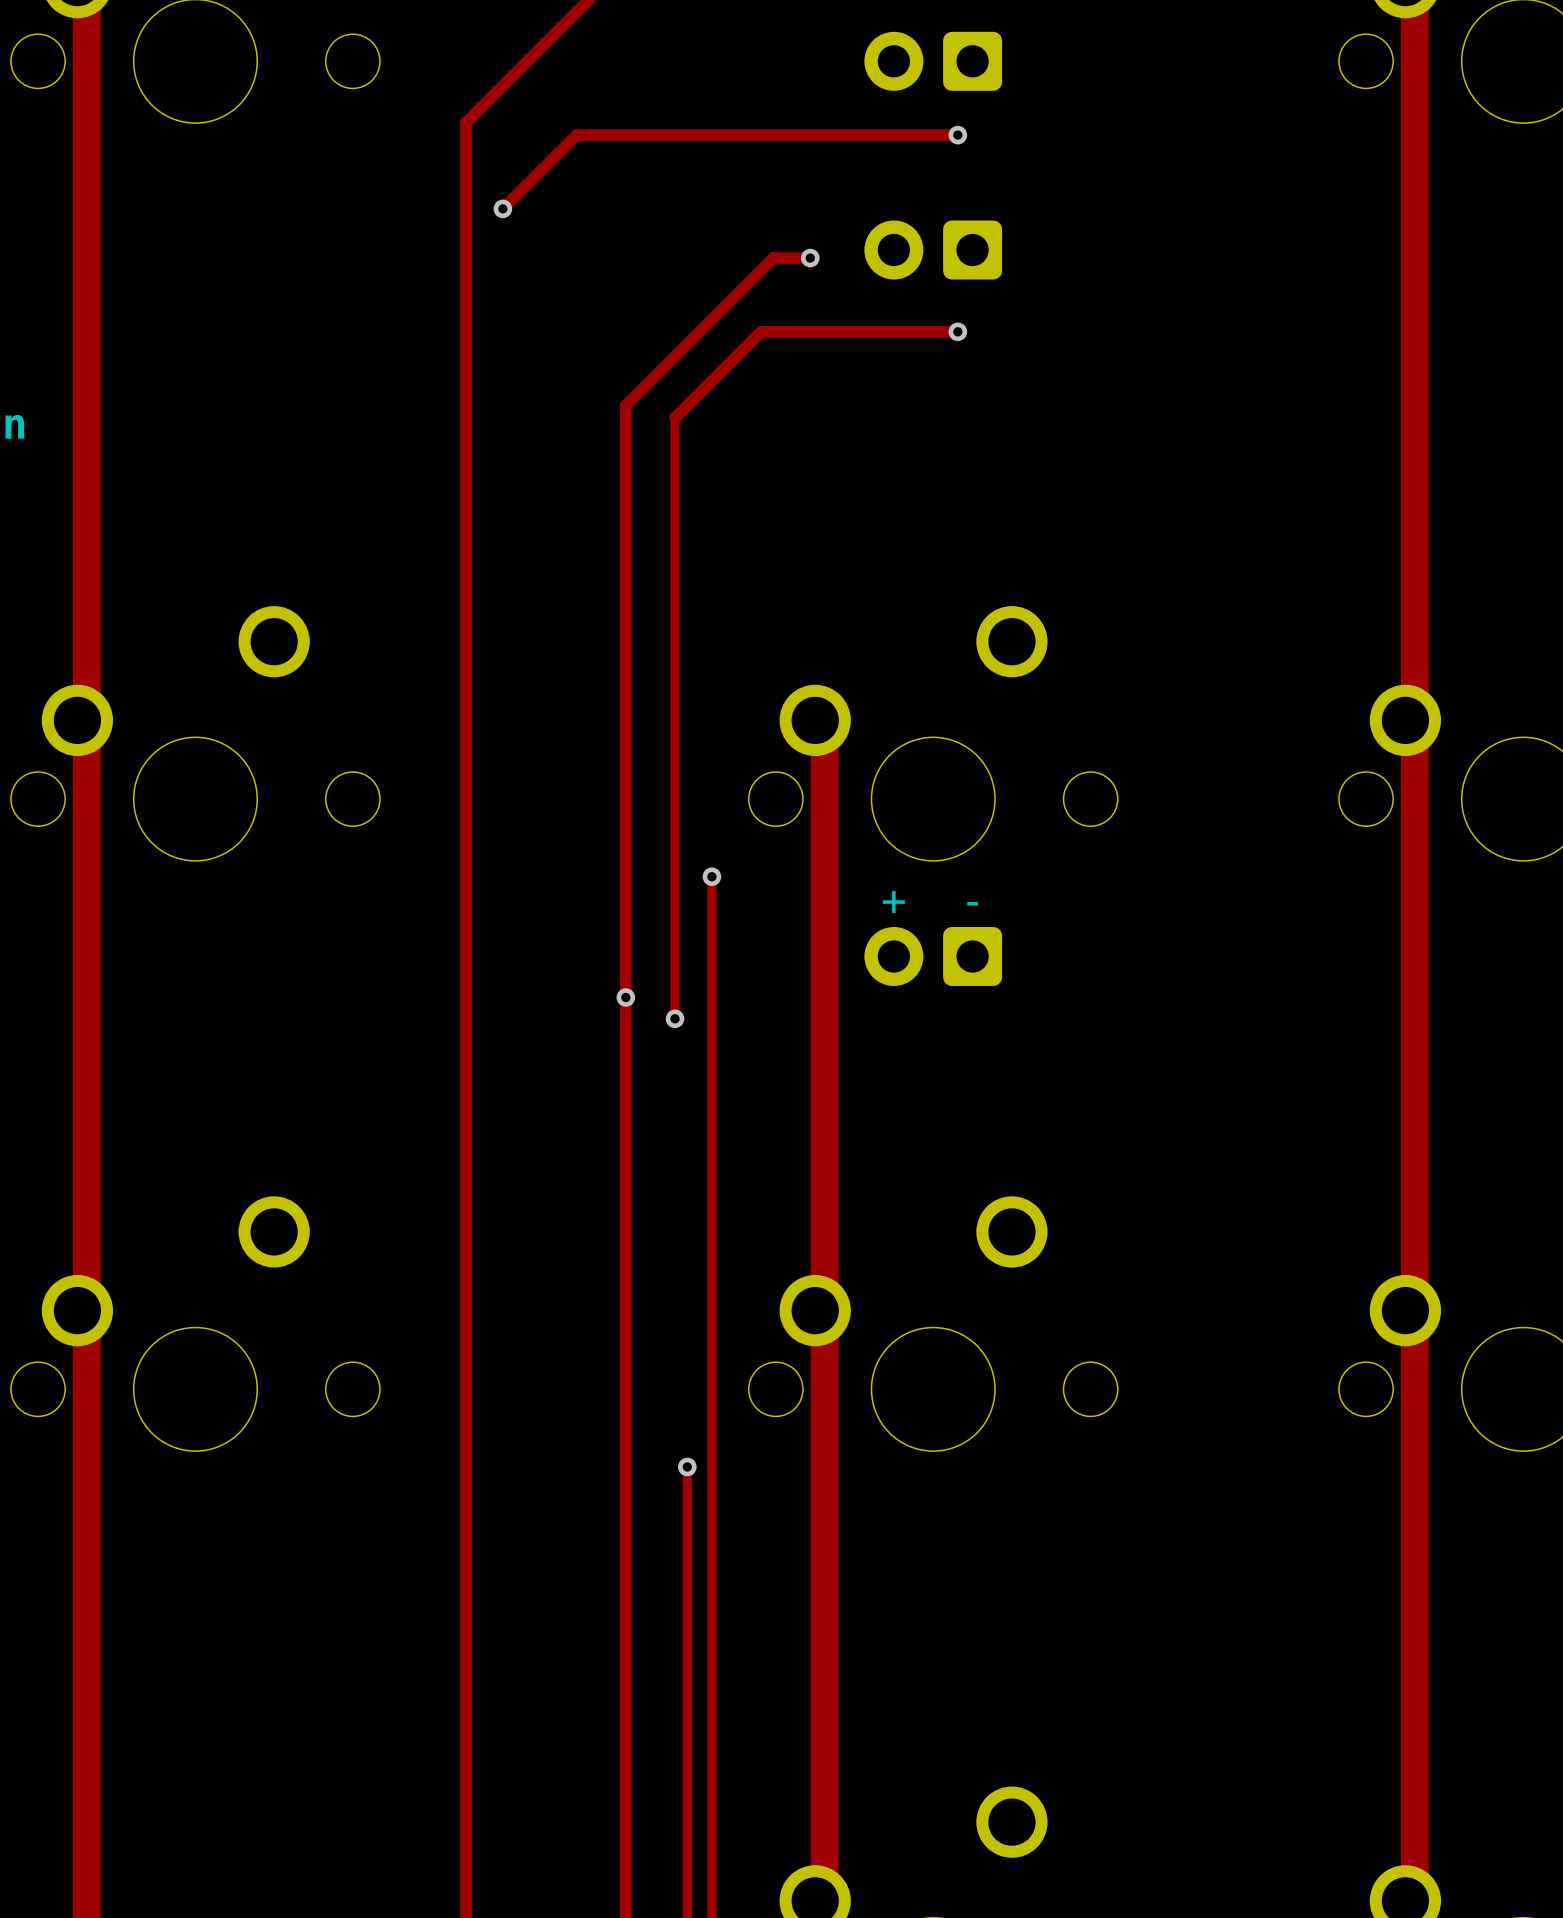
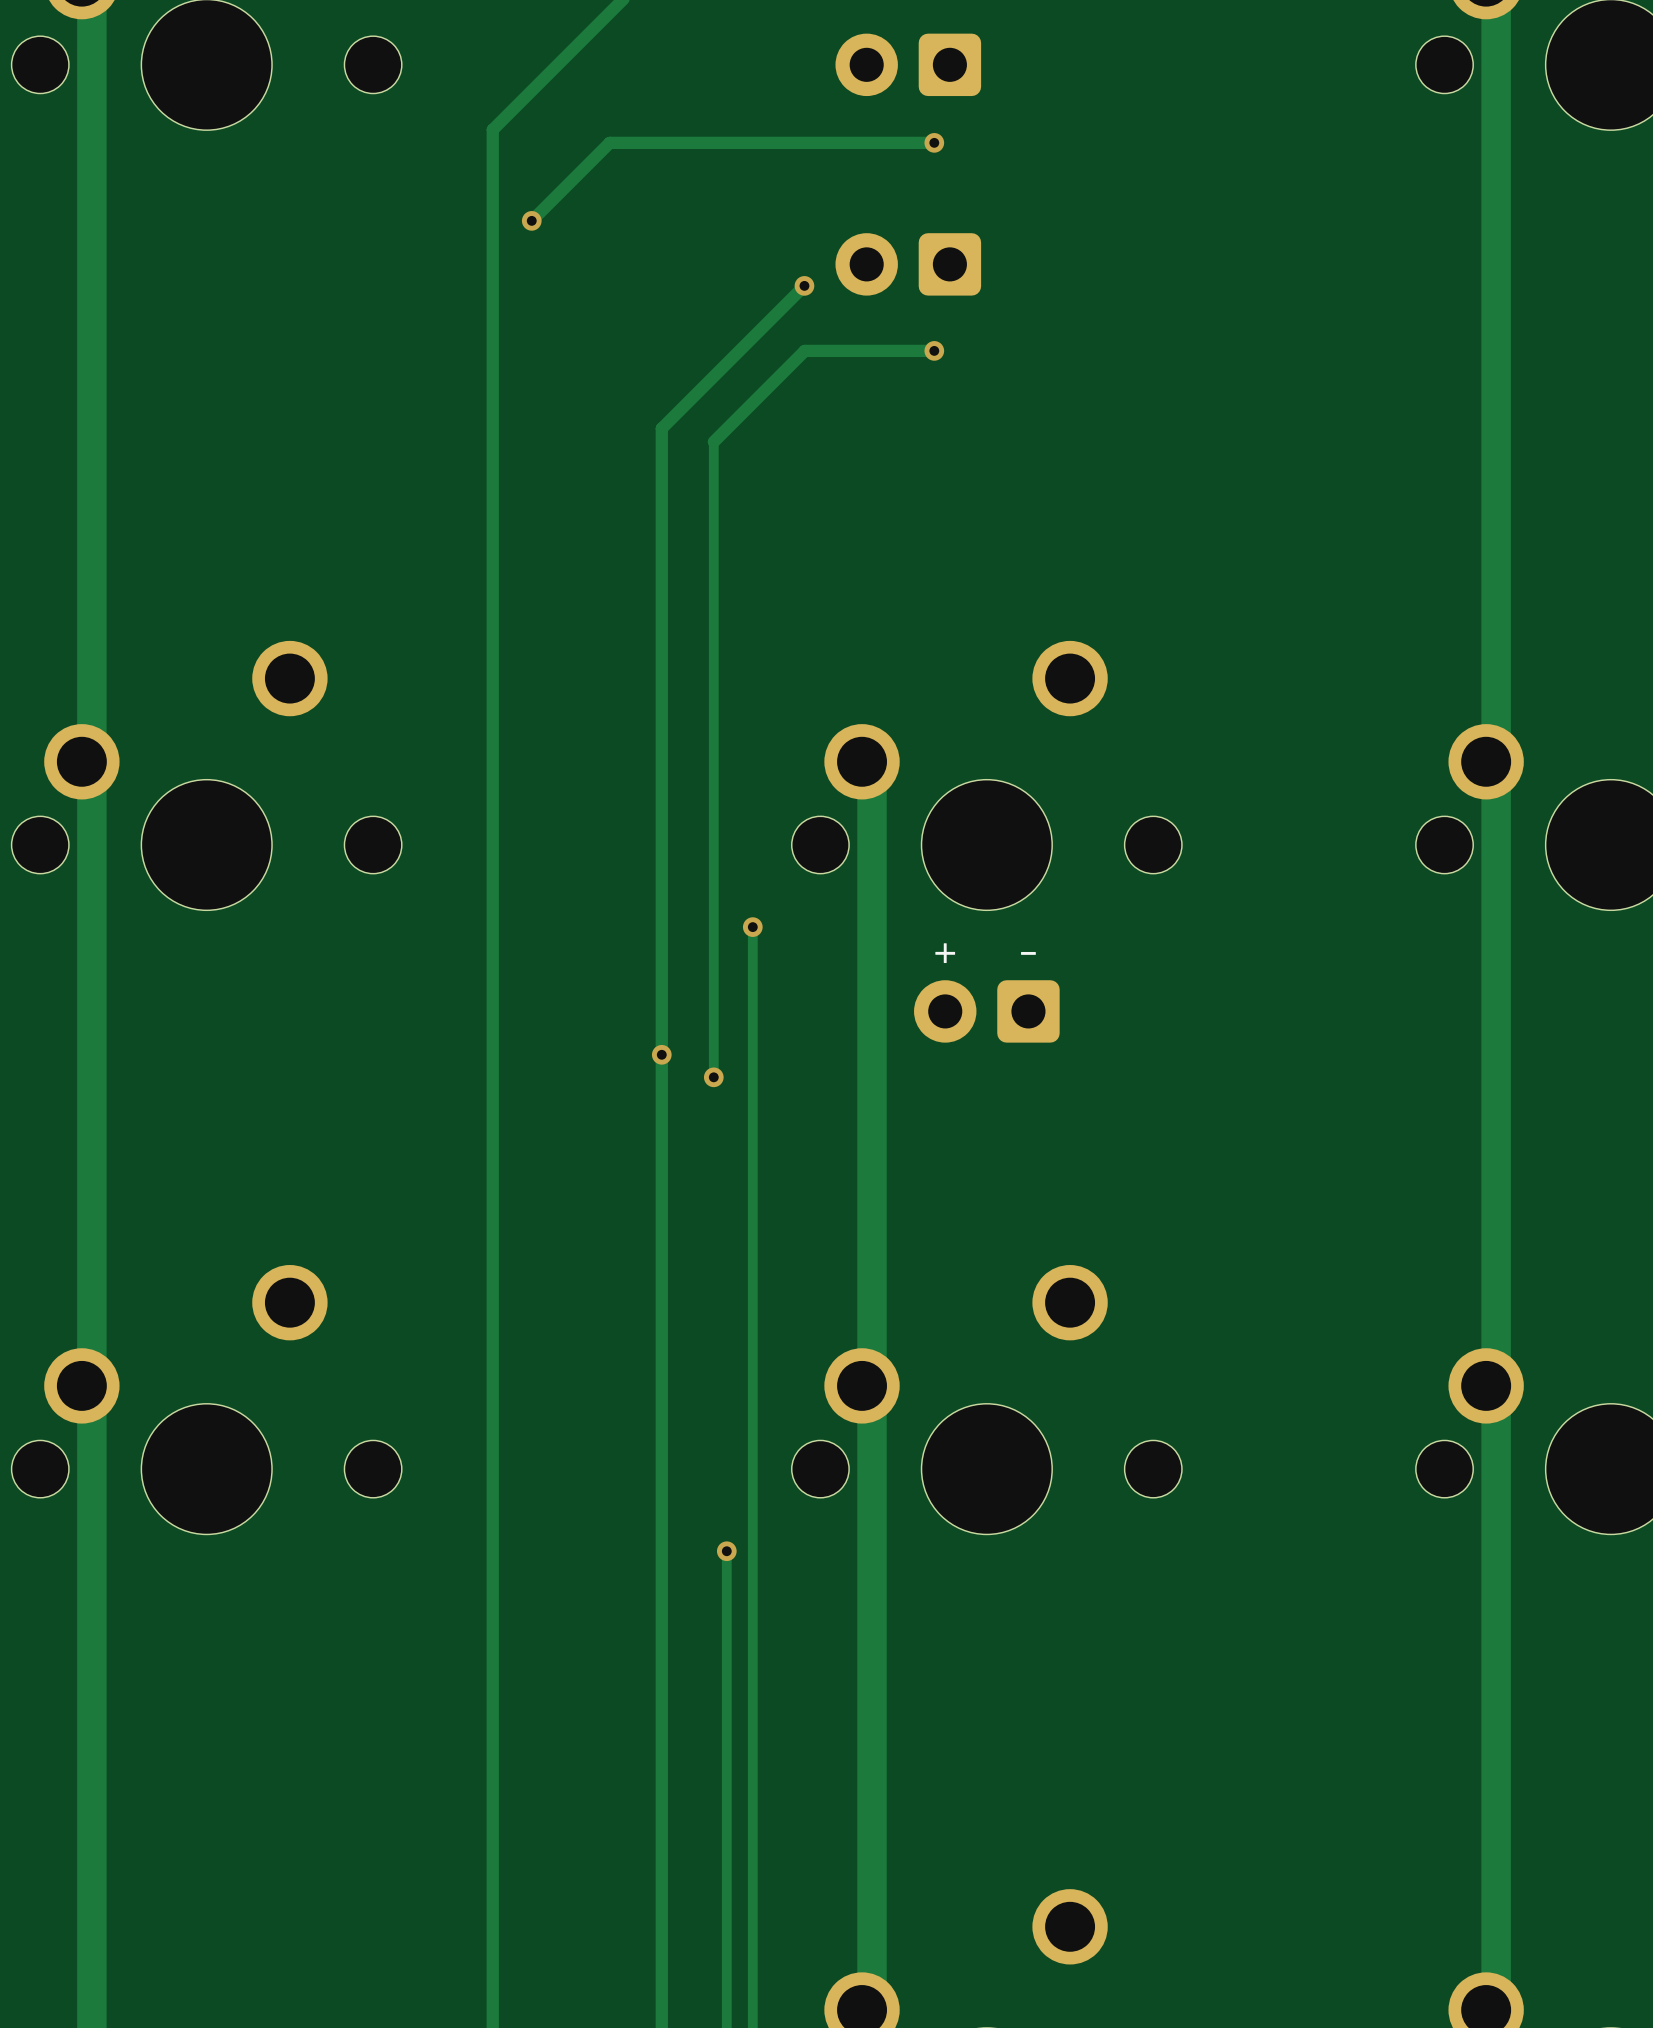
part position: (933, 61) -> (908, 64)
track: (883, 135) (957, 135) -> none
via: none -> (934, 142)
via: (957, 135) -> none
part position: (933, 250) -> (908, 264)
track: (810, 258) (773, 258) (625, 405) -> (804, 285) (661, 428)
via position: (810, 258) -> (804, 285)
track: (883, 331) (957, 331) -> none
via: none -> (934, 350)
via: (957, 331) -> none

